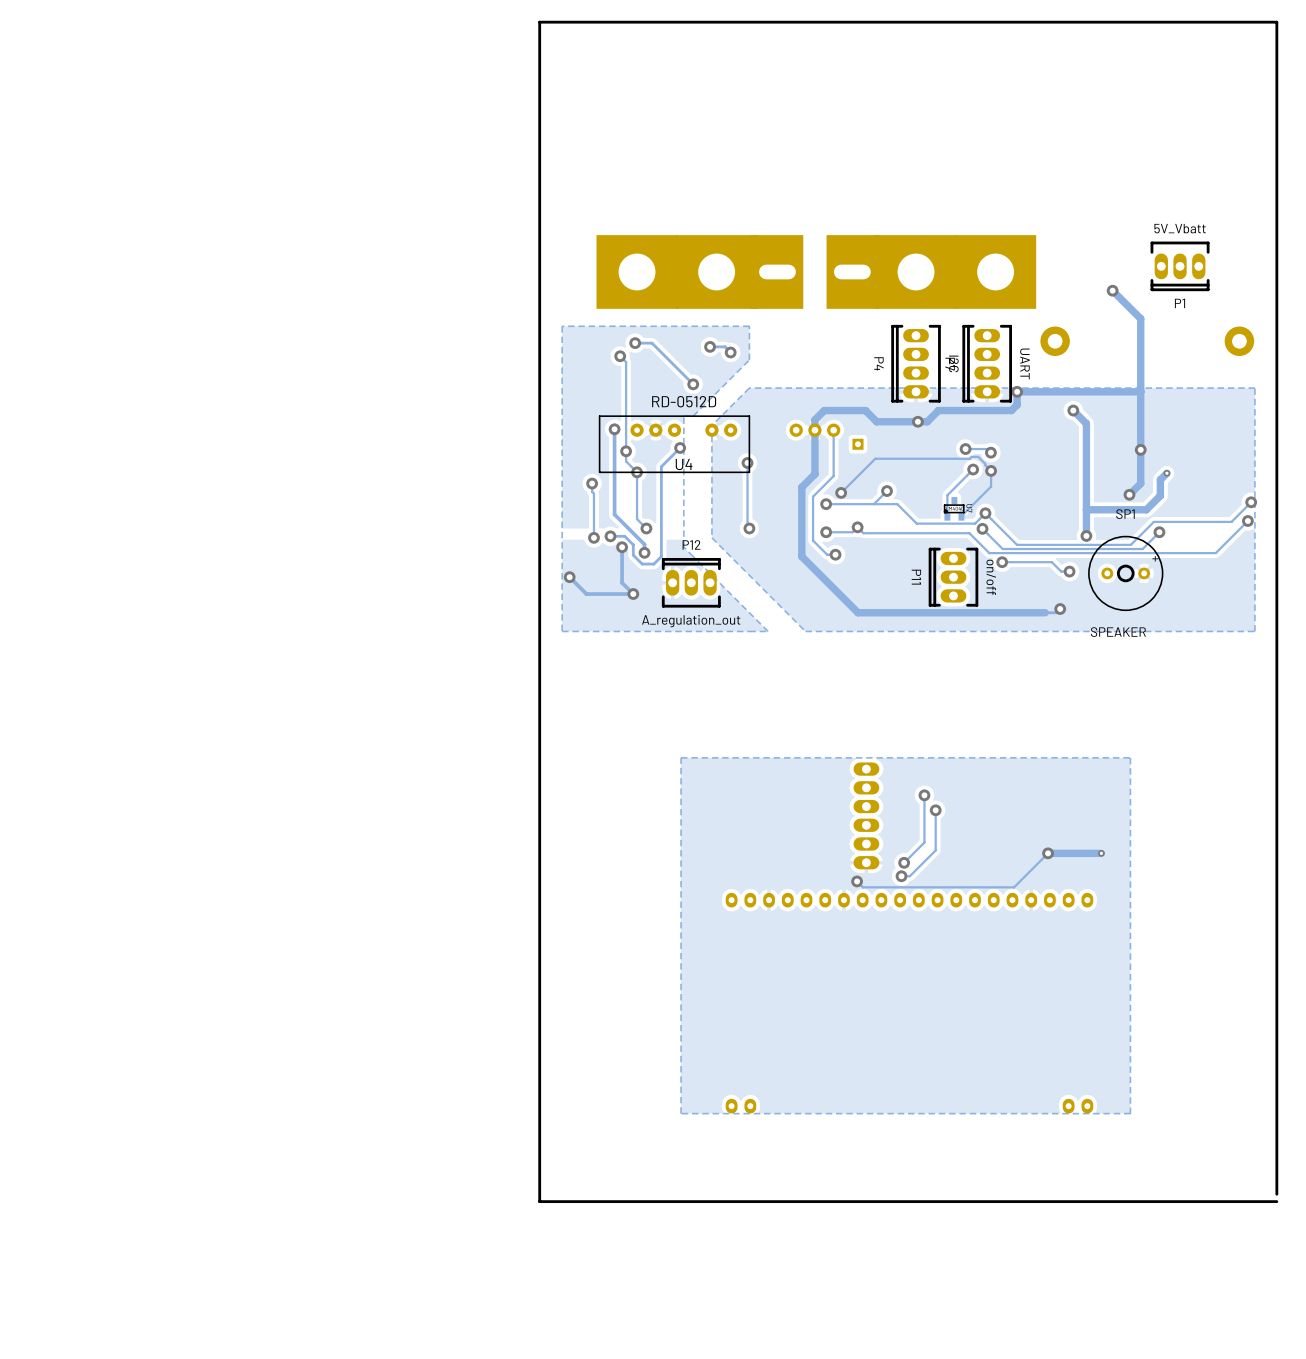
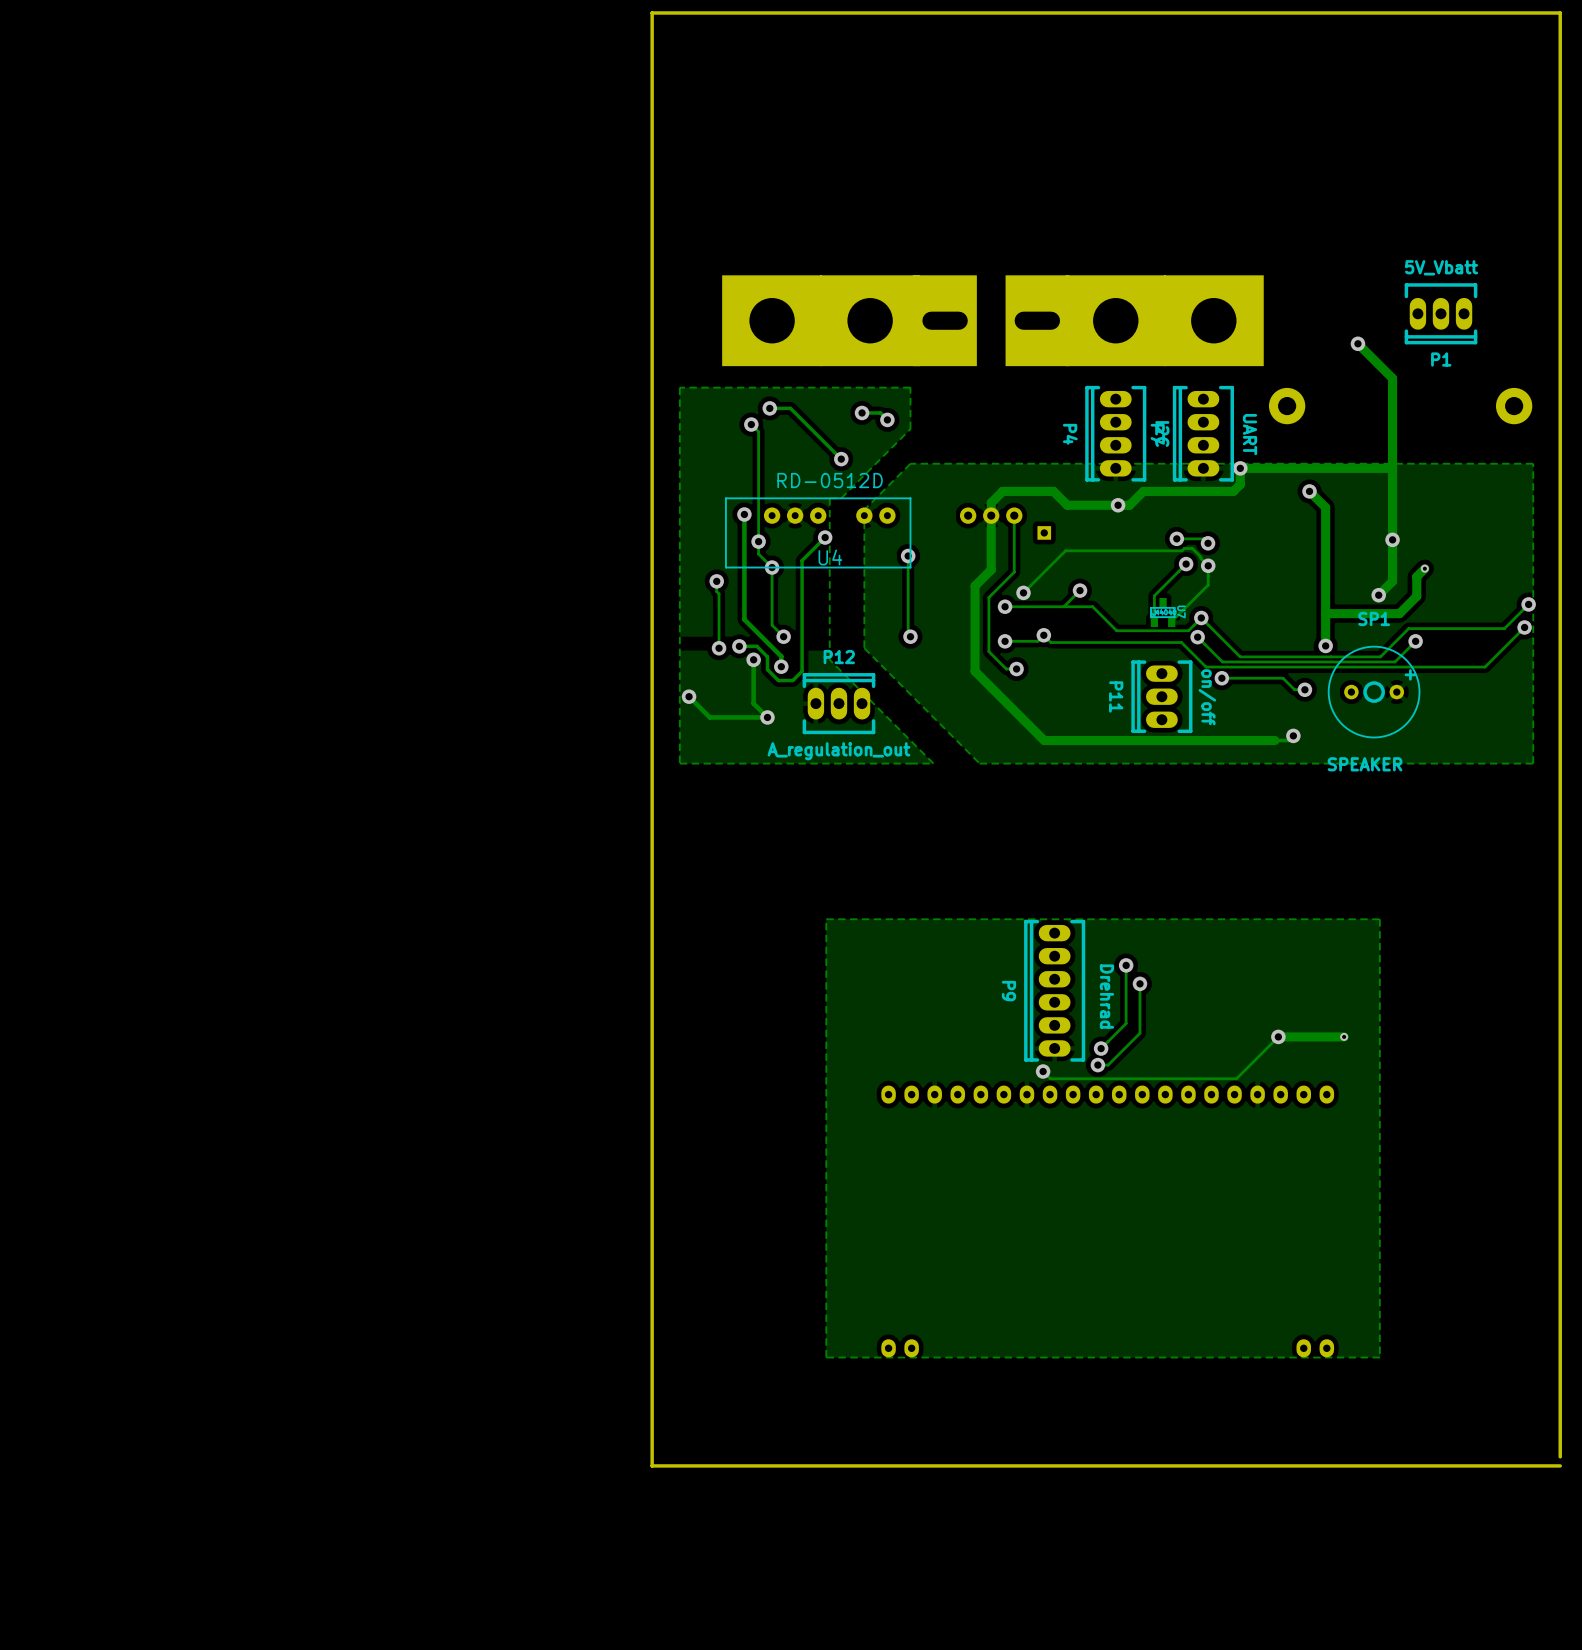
P9 side: top (866, 815) -> bottom (1054, 990)

